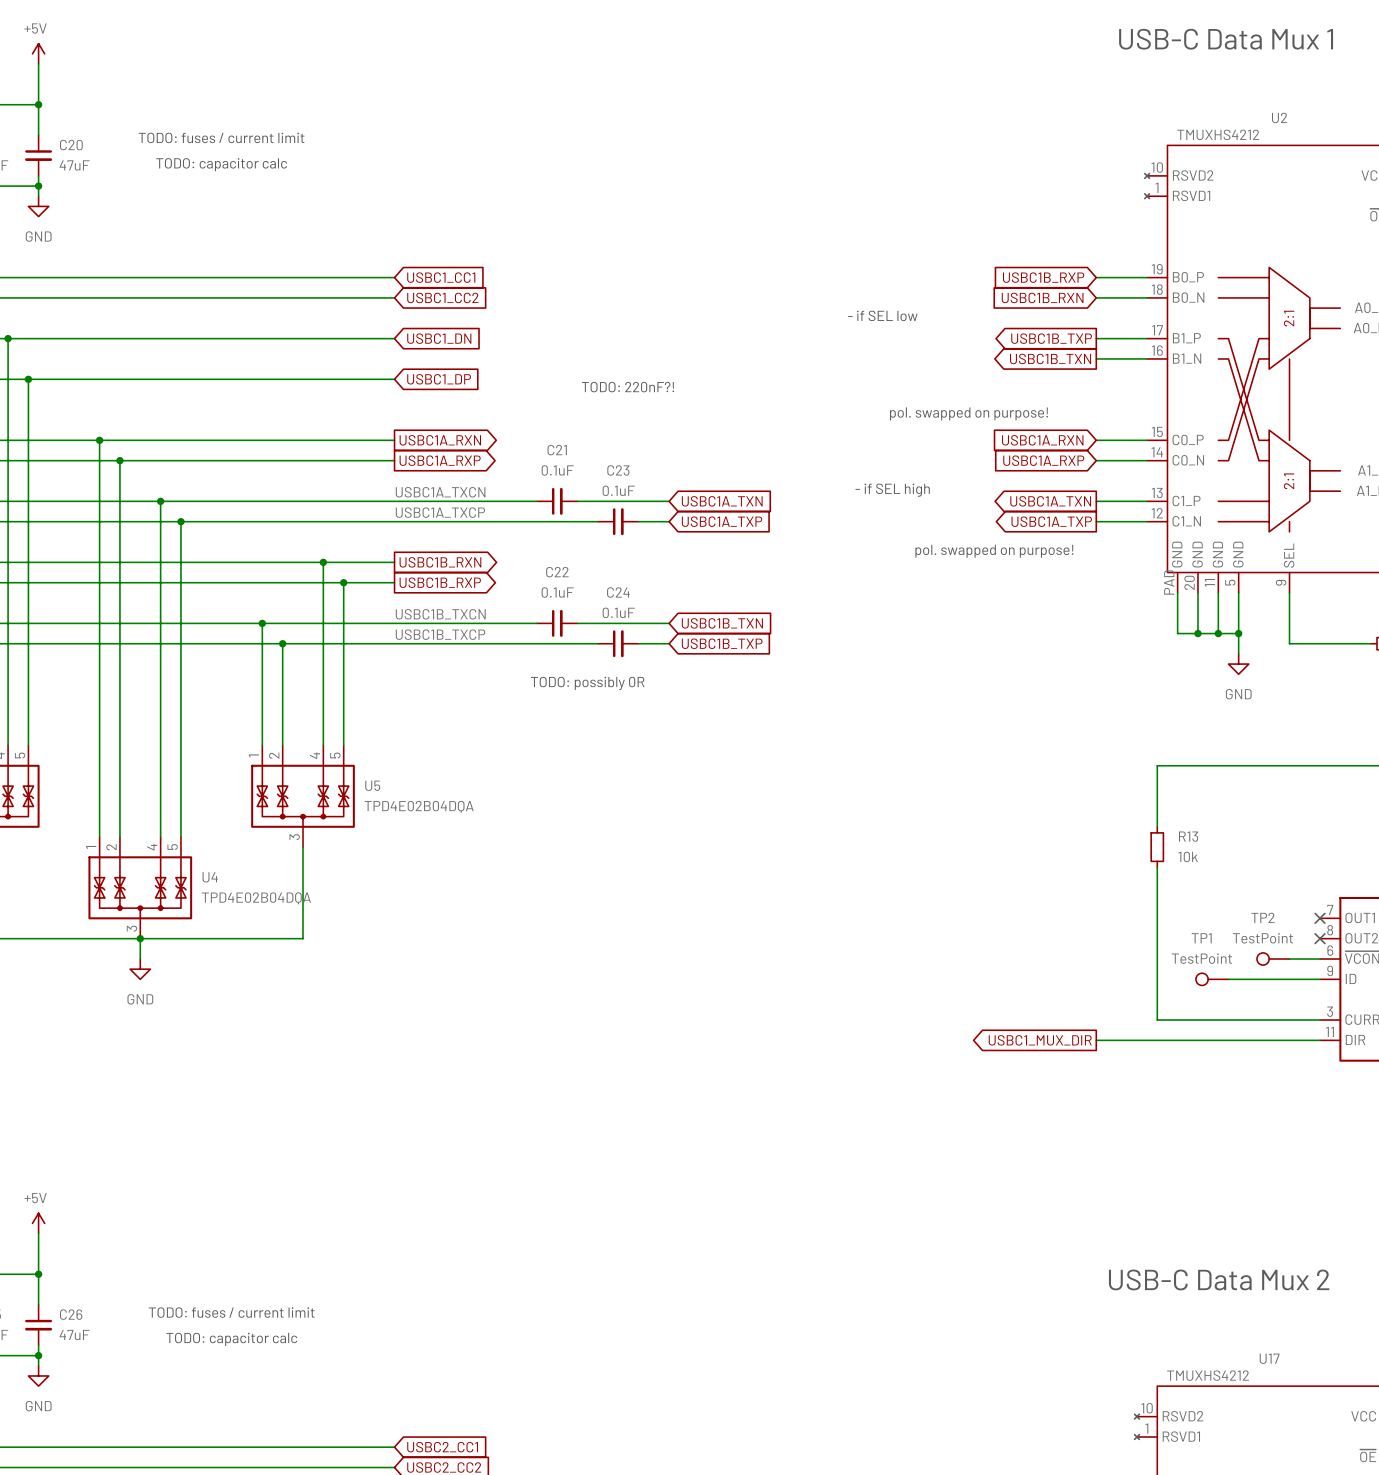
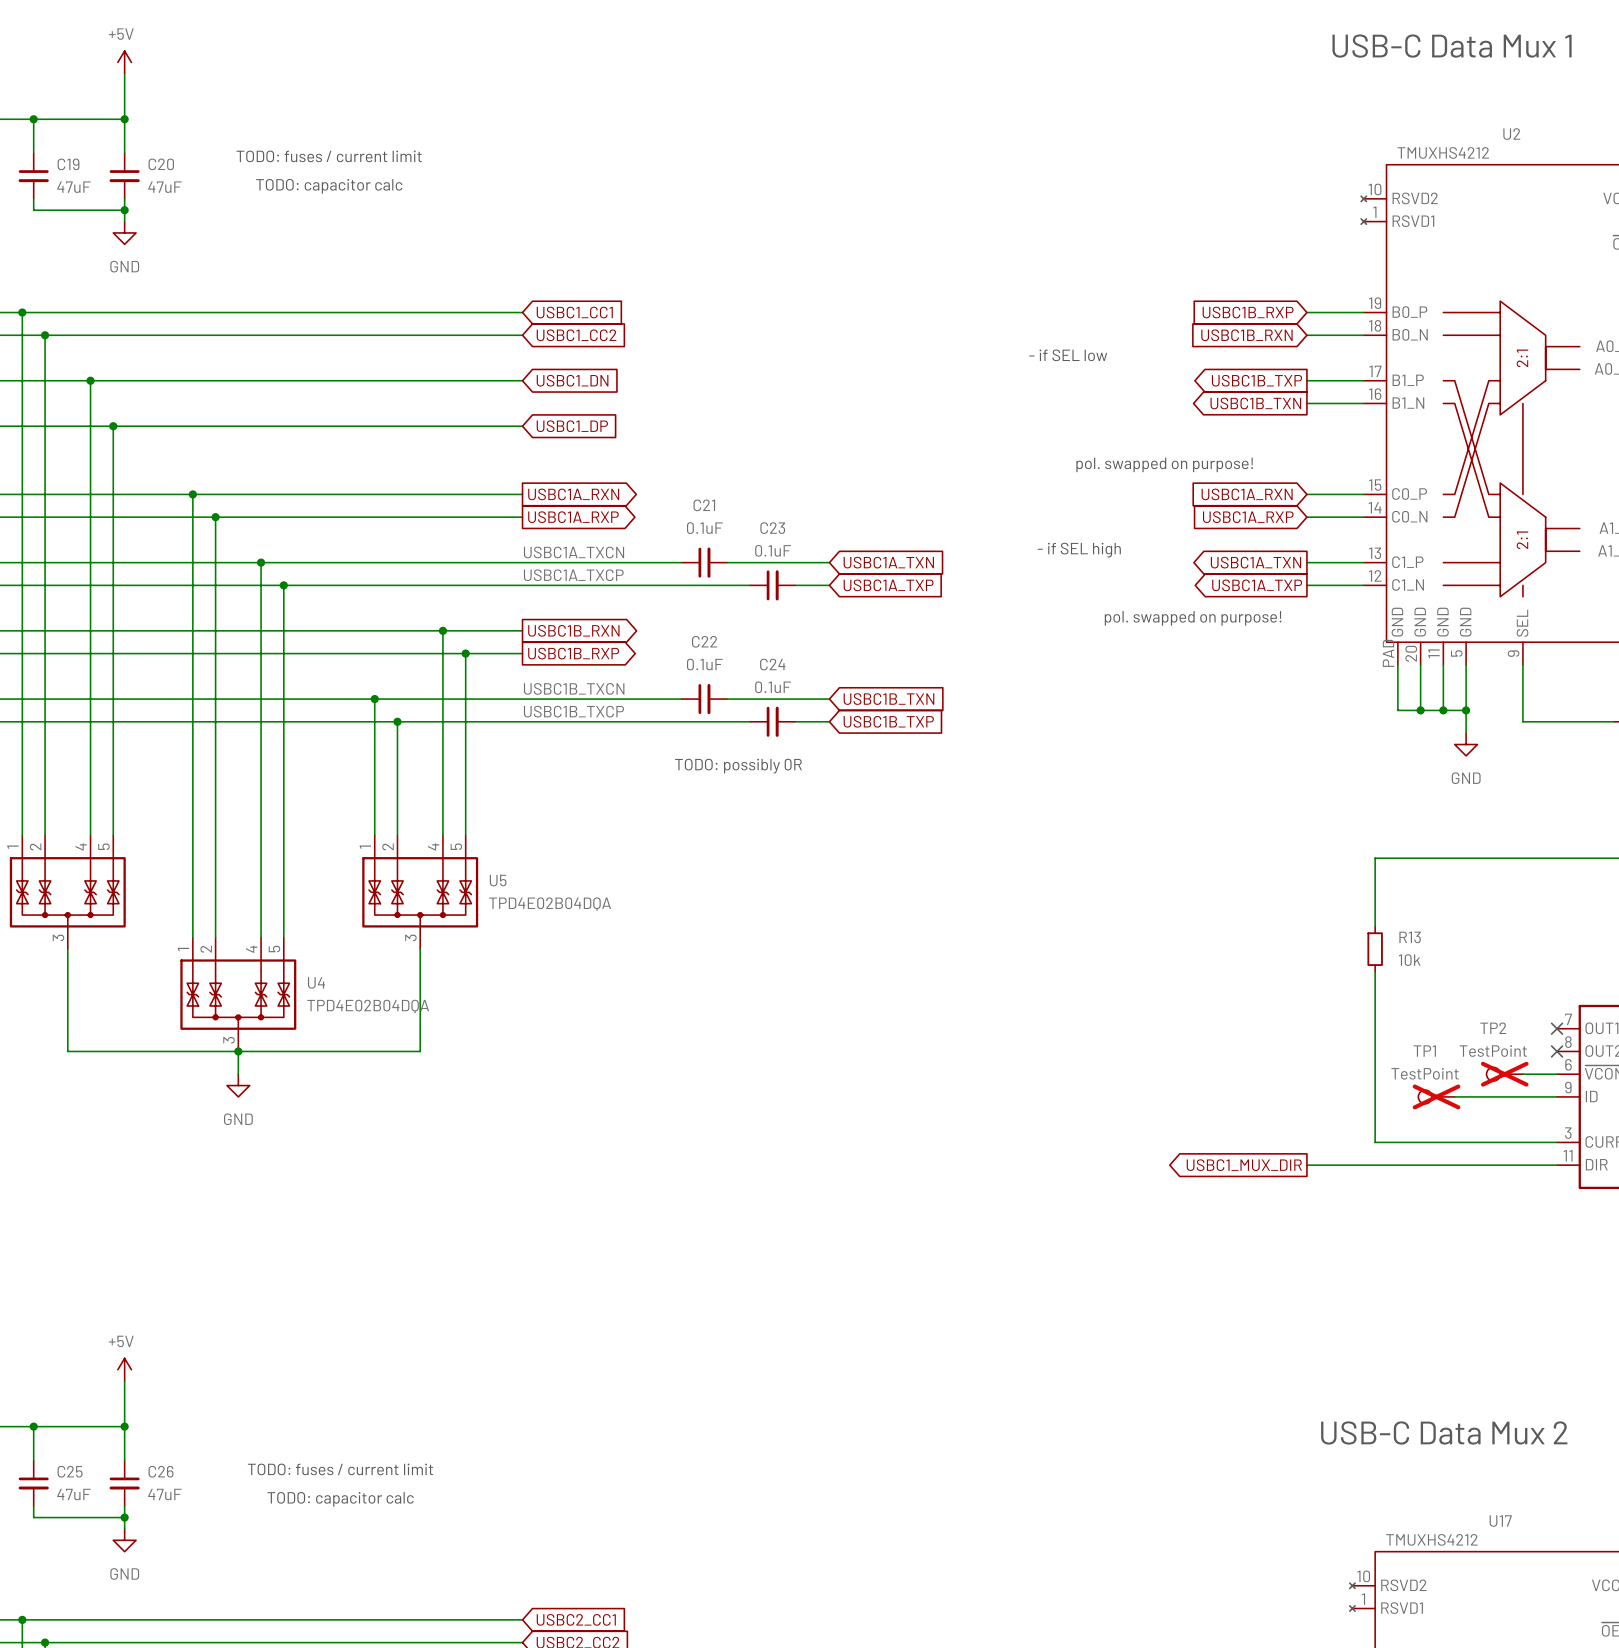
text: TODO: 220nF?! (627, 387) -> none
TP2 do-not-place cross: none -> (1504, 1074)
TP1 do-not-place cross: none -> (1436, 1096)

